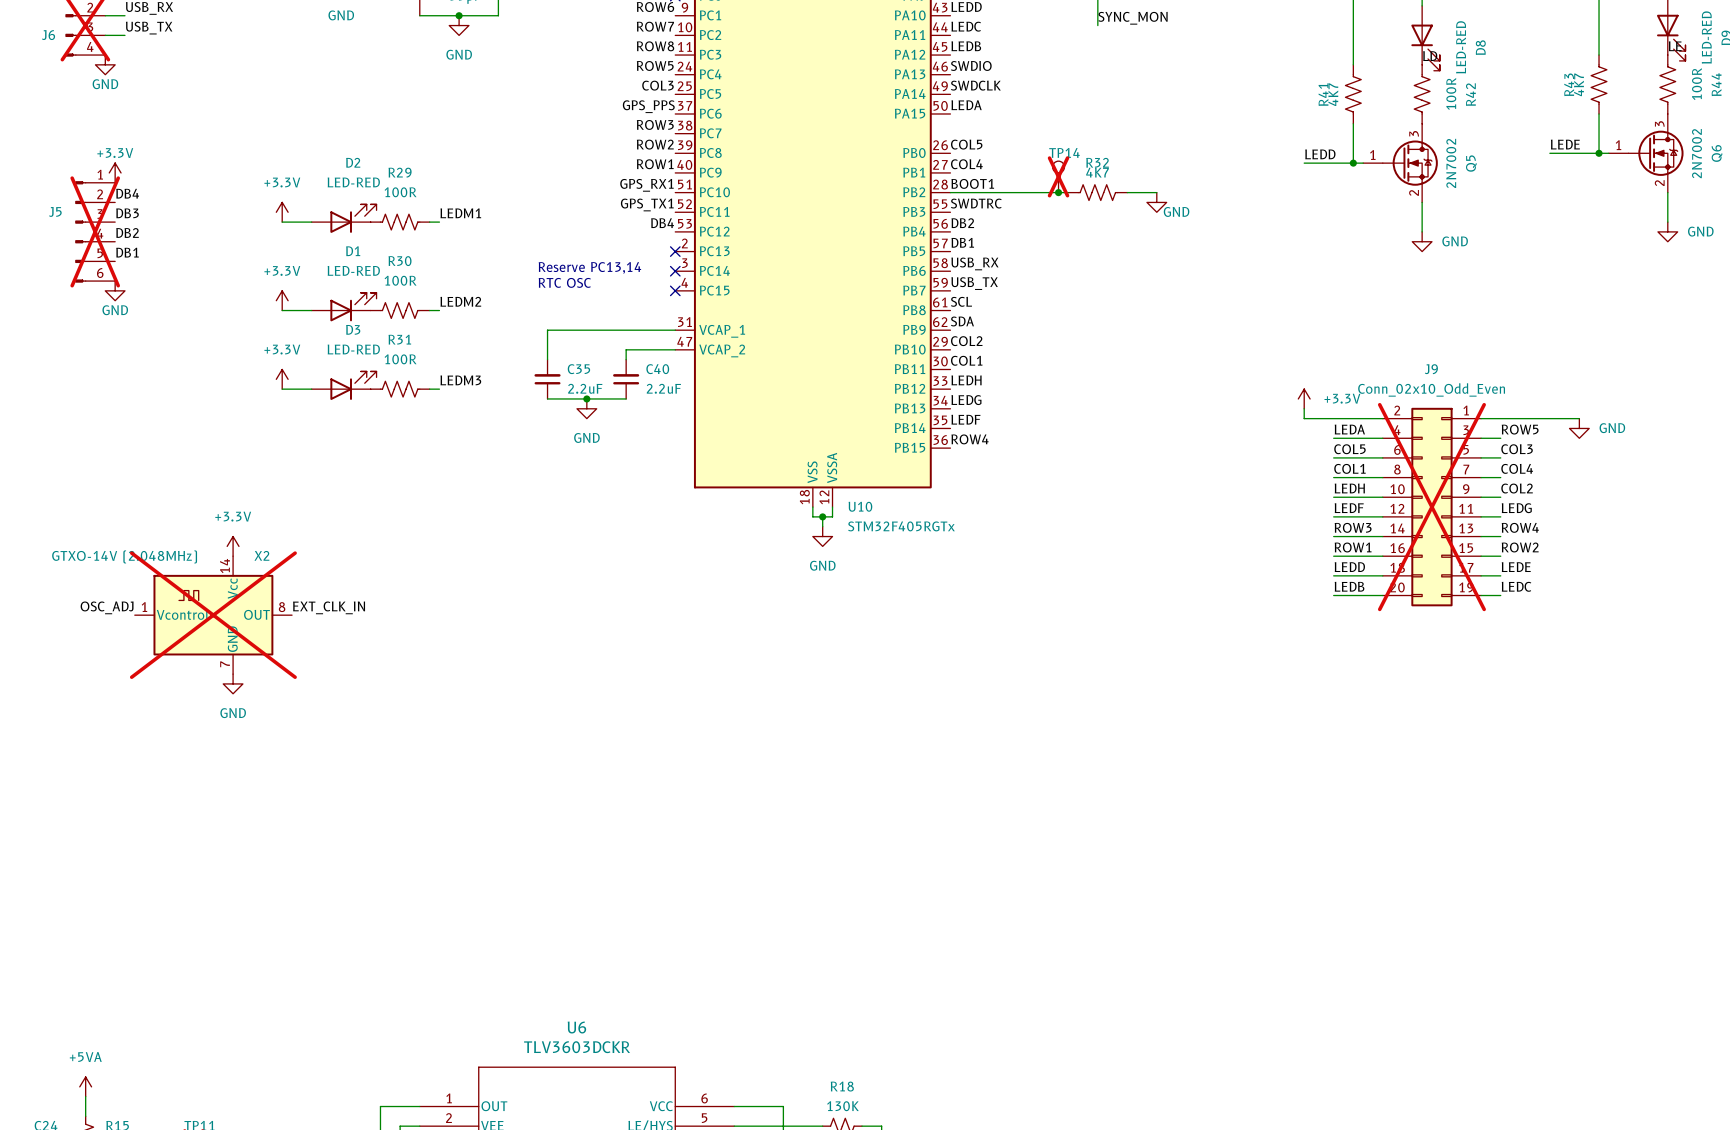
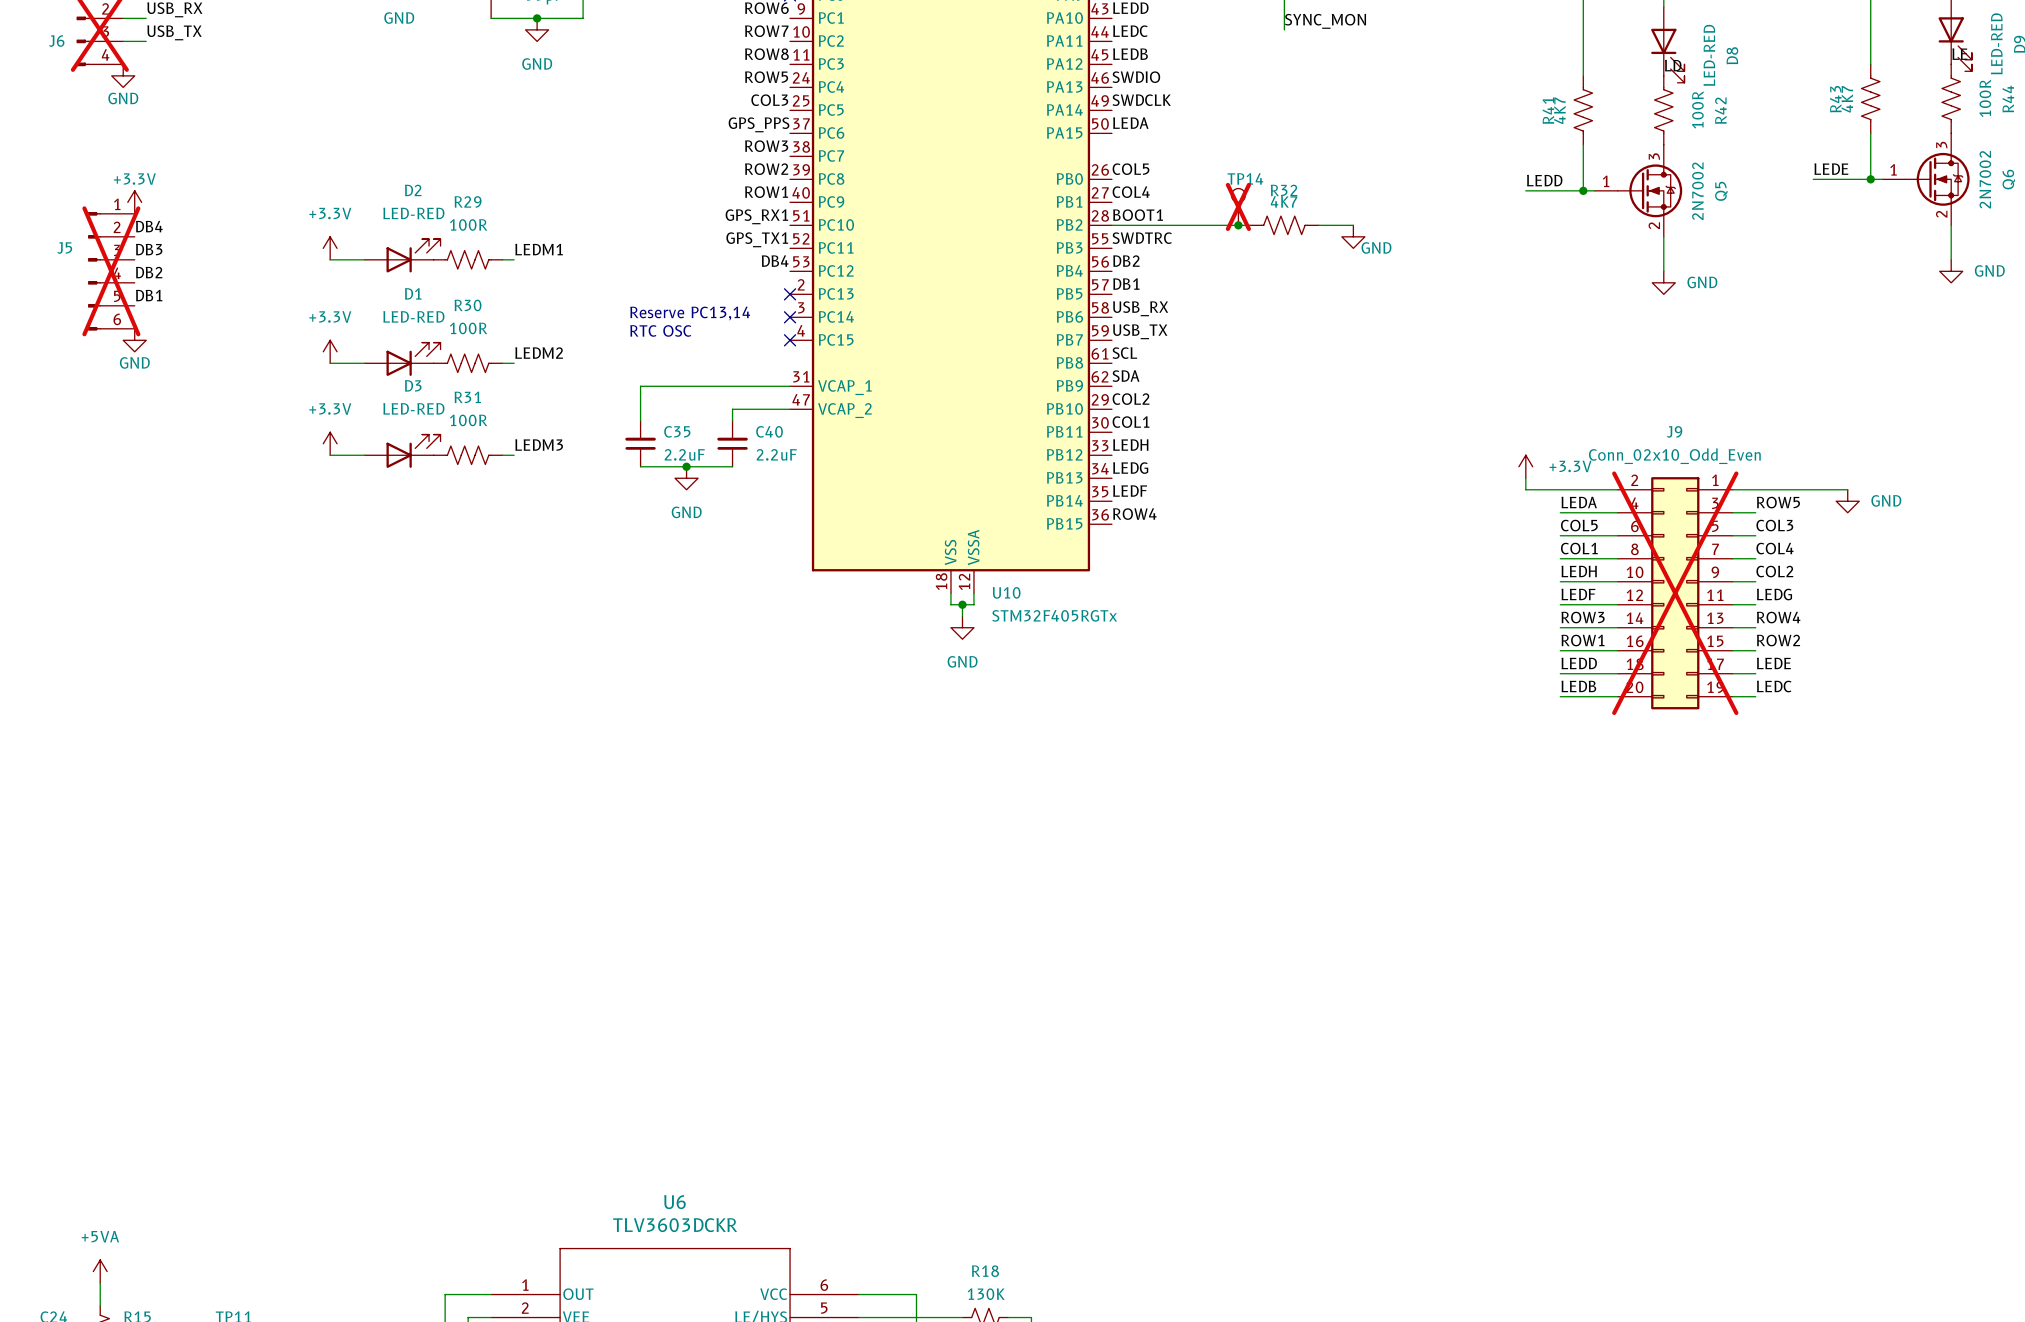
power symbol: +3.3V (233, 546) -> none
label: OSC_ADJ (107, 607) -> none
label: EXT_CLK_IN (329, 607) -> none
X2: GTXO-14V (2.048MHz) (213, 615) -> none
power symbol: GND (233, 683) -> none

